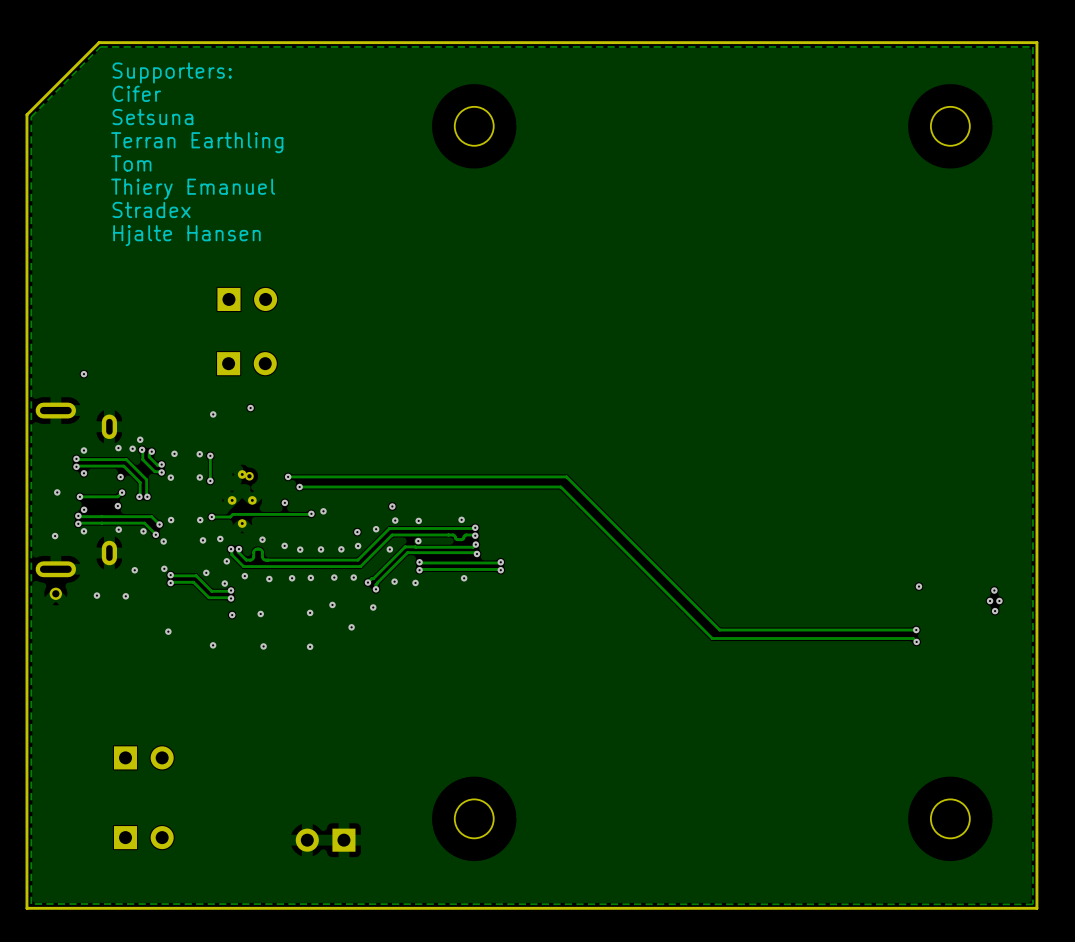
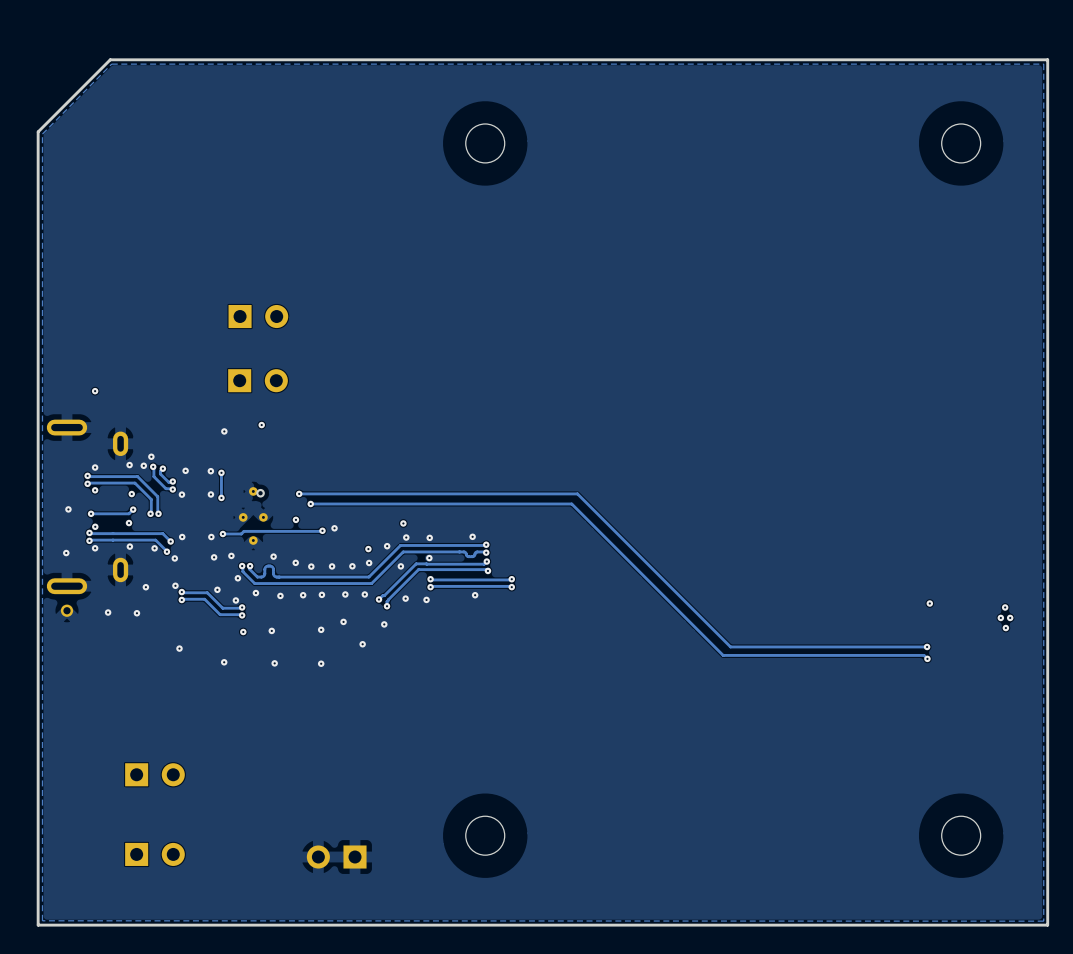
text: Supporters: (172, 72) -> none
text: Cifer (136, 93) -> none
text: Setsuna (152, 117) -> none
text: Terran Earthling (197, 142) -> none
text: Tom (131, 163) -> none
text: Thiery Emanuel (193, 189) -> none
text: Stradex (151, 209) -> none
text: Hjalte Hansen (186, 235) -> none

